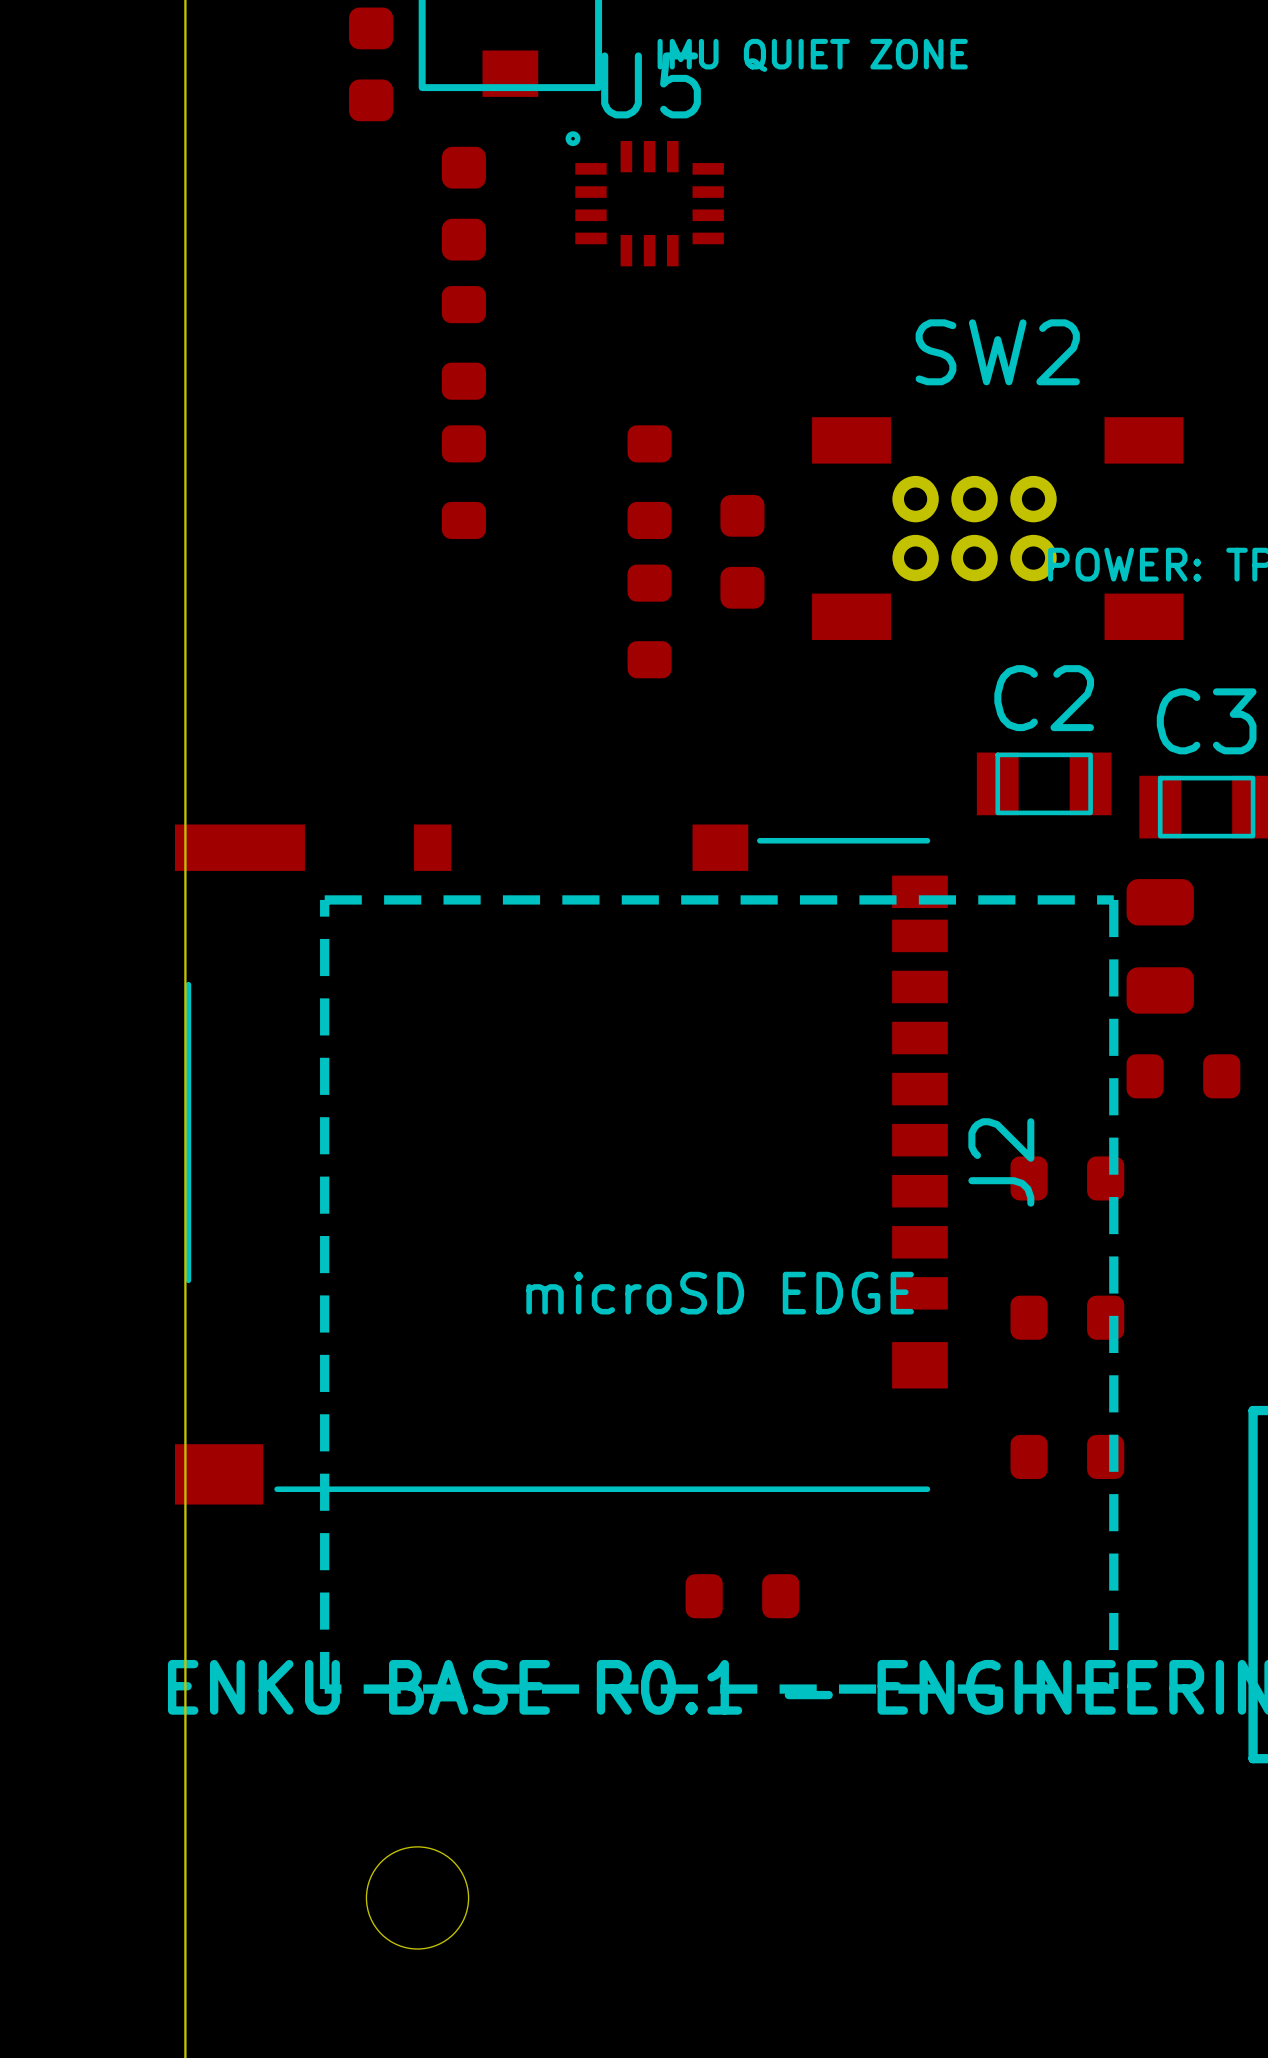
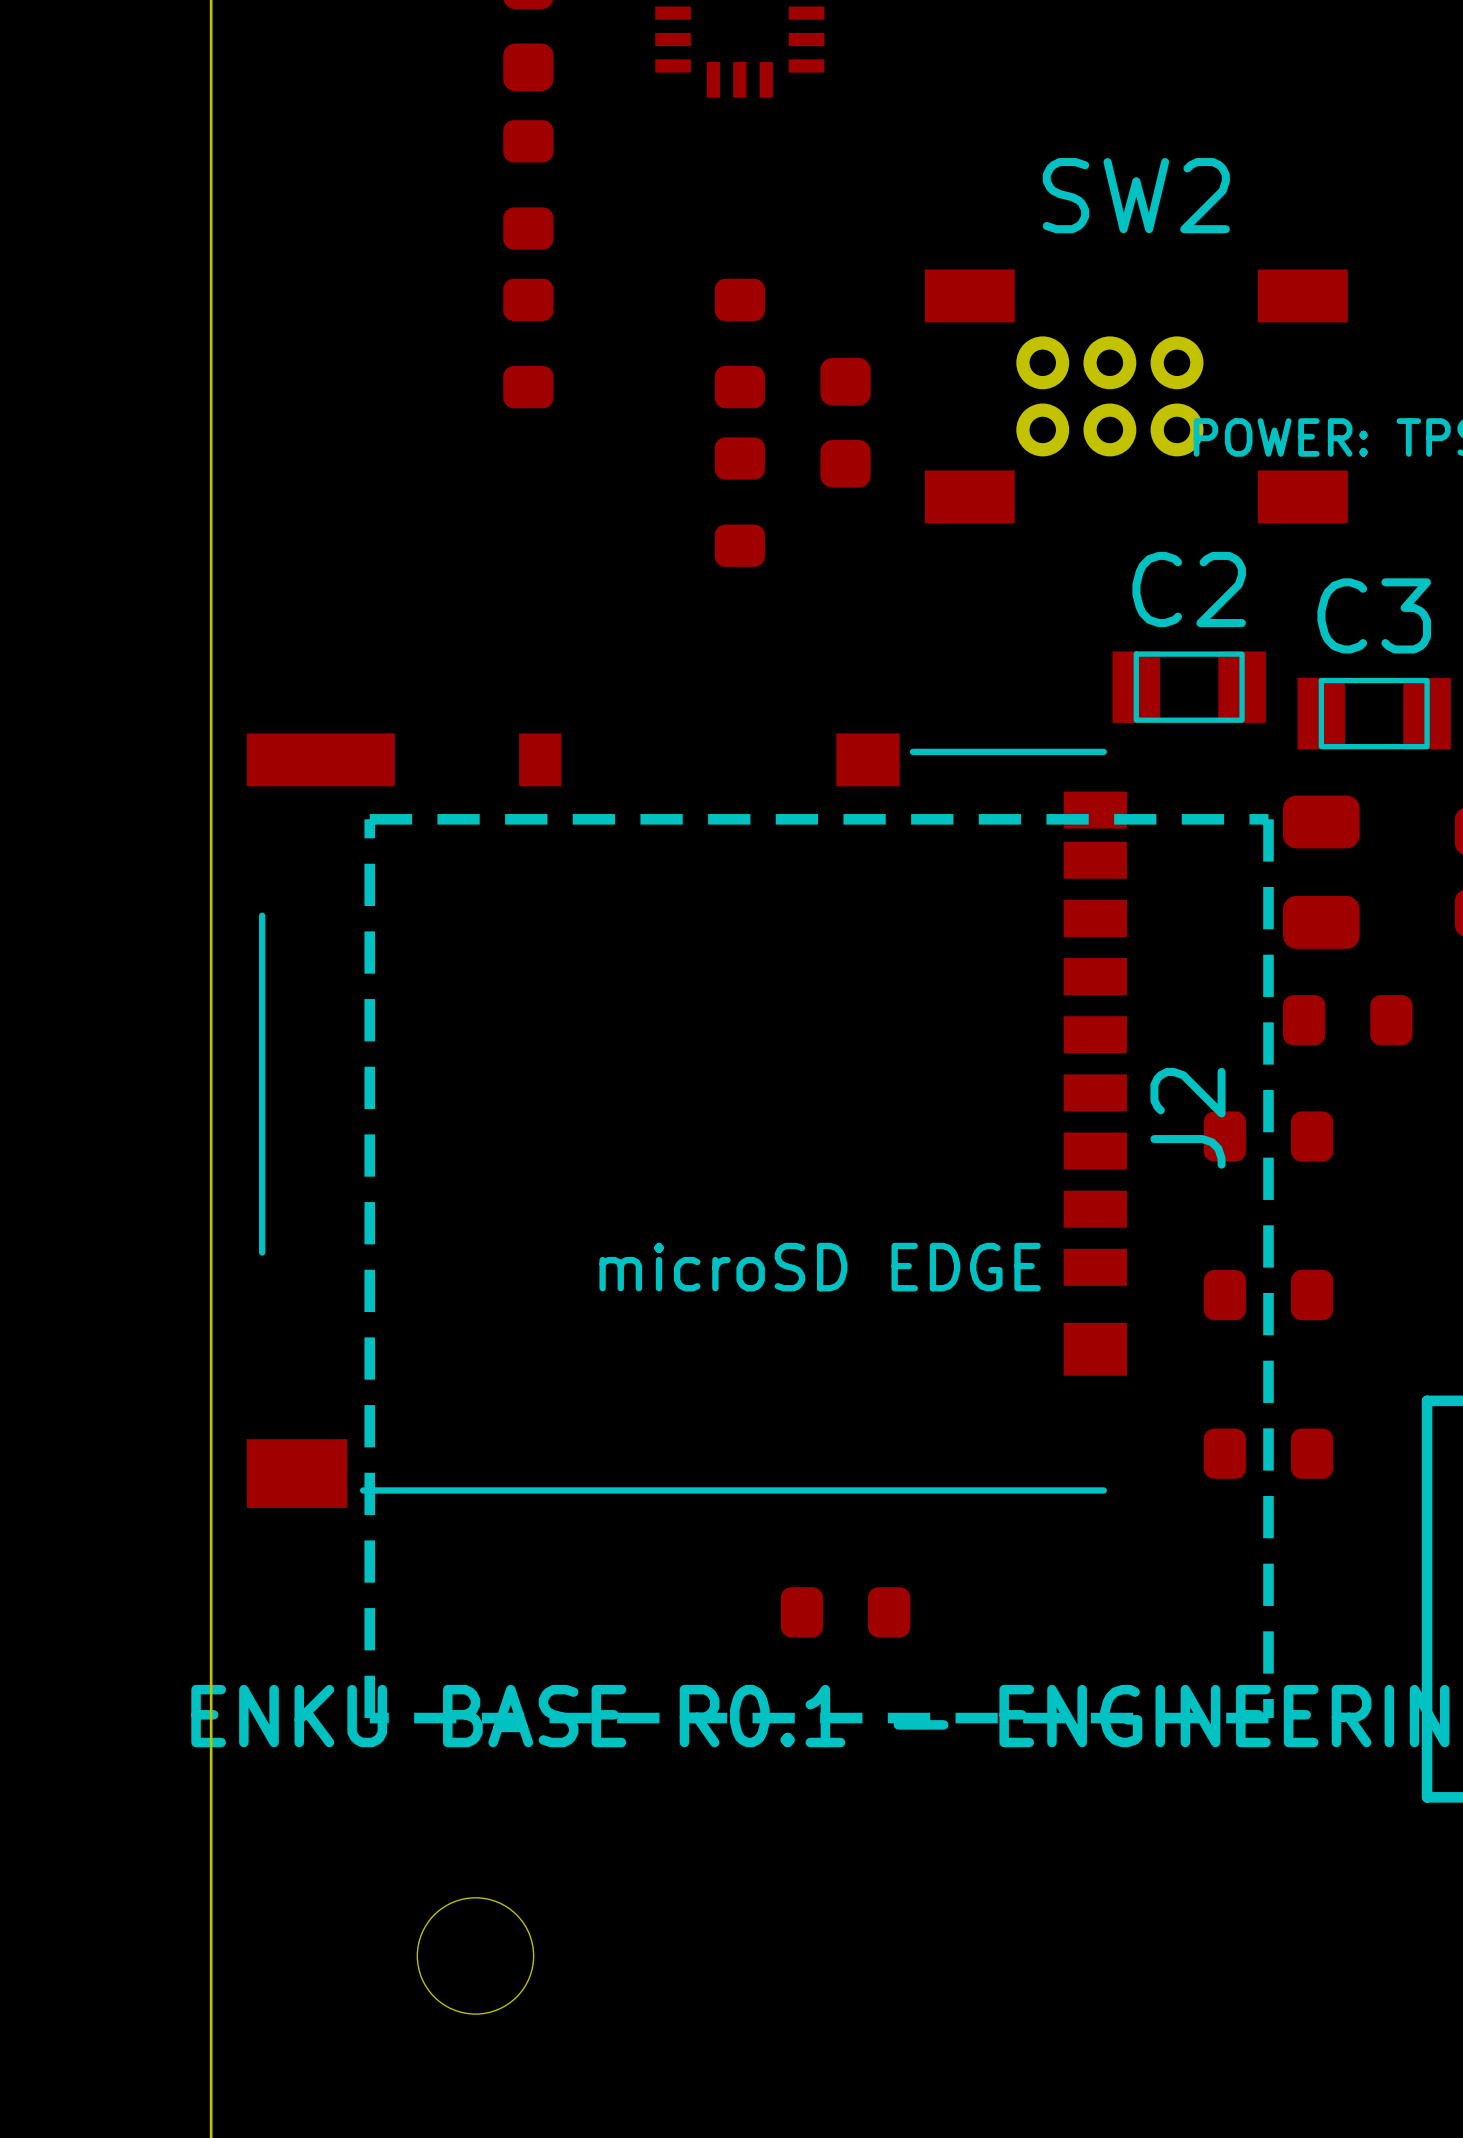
J2 position: (561, 1164) -> (686, 1120)
part position: (1067, 1178) -> (1268, 1136)
part position: (1067, 1317) -> (1268, 1295)
part position: (1067, 1456) -> (1268, 1453)

